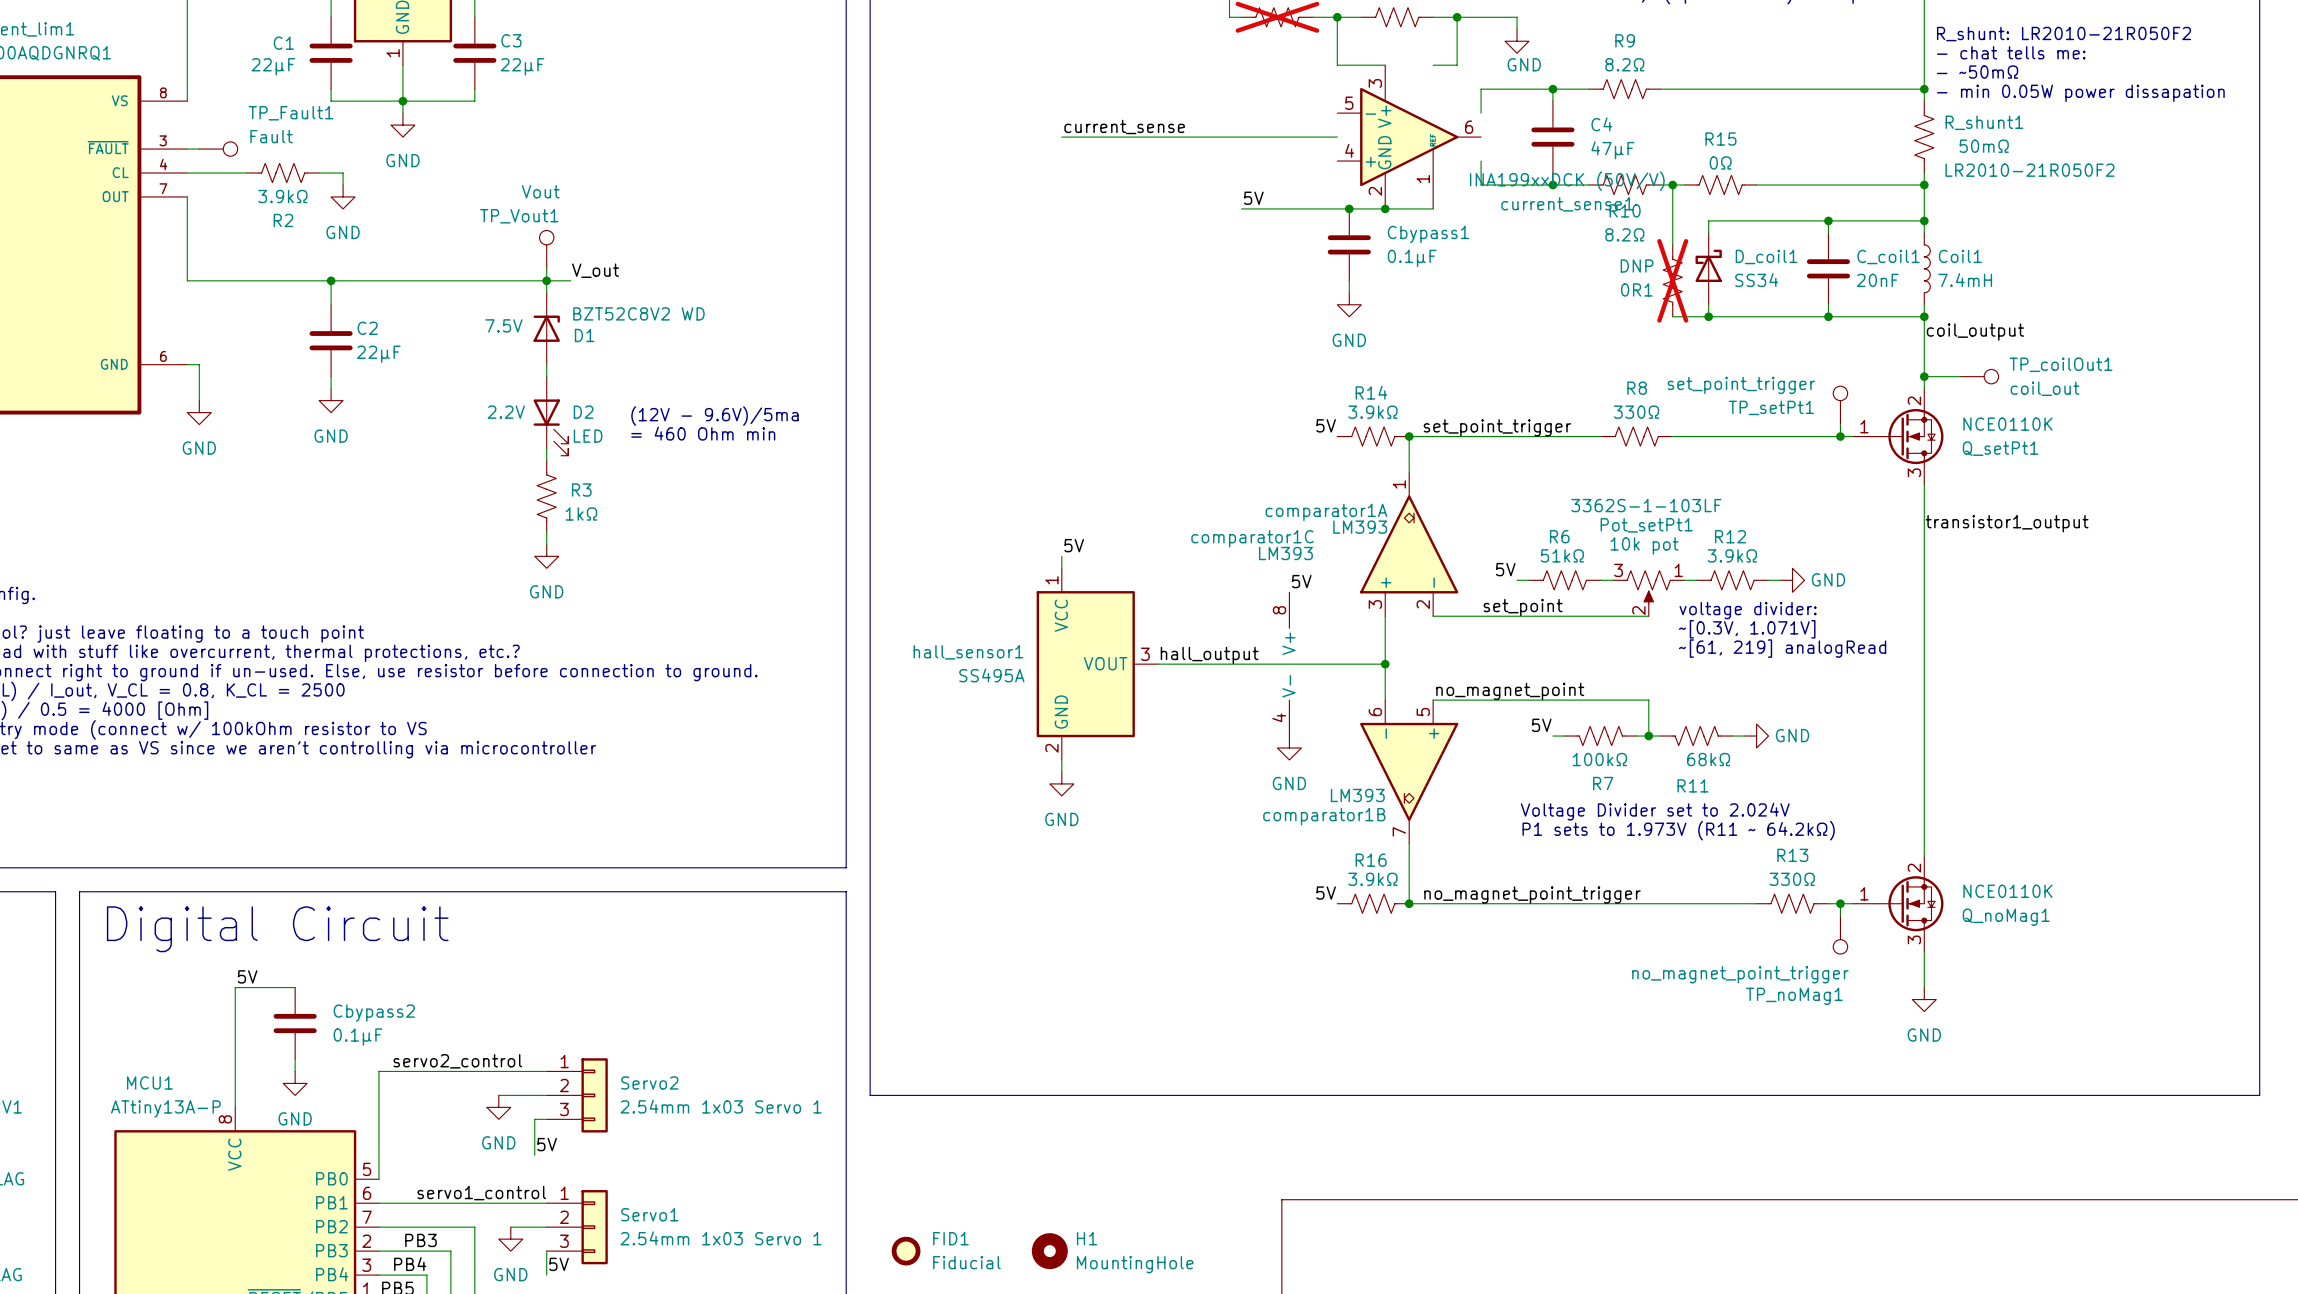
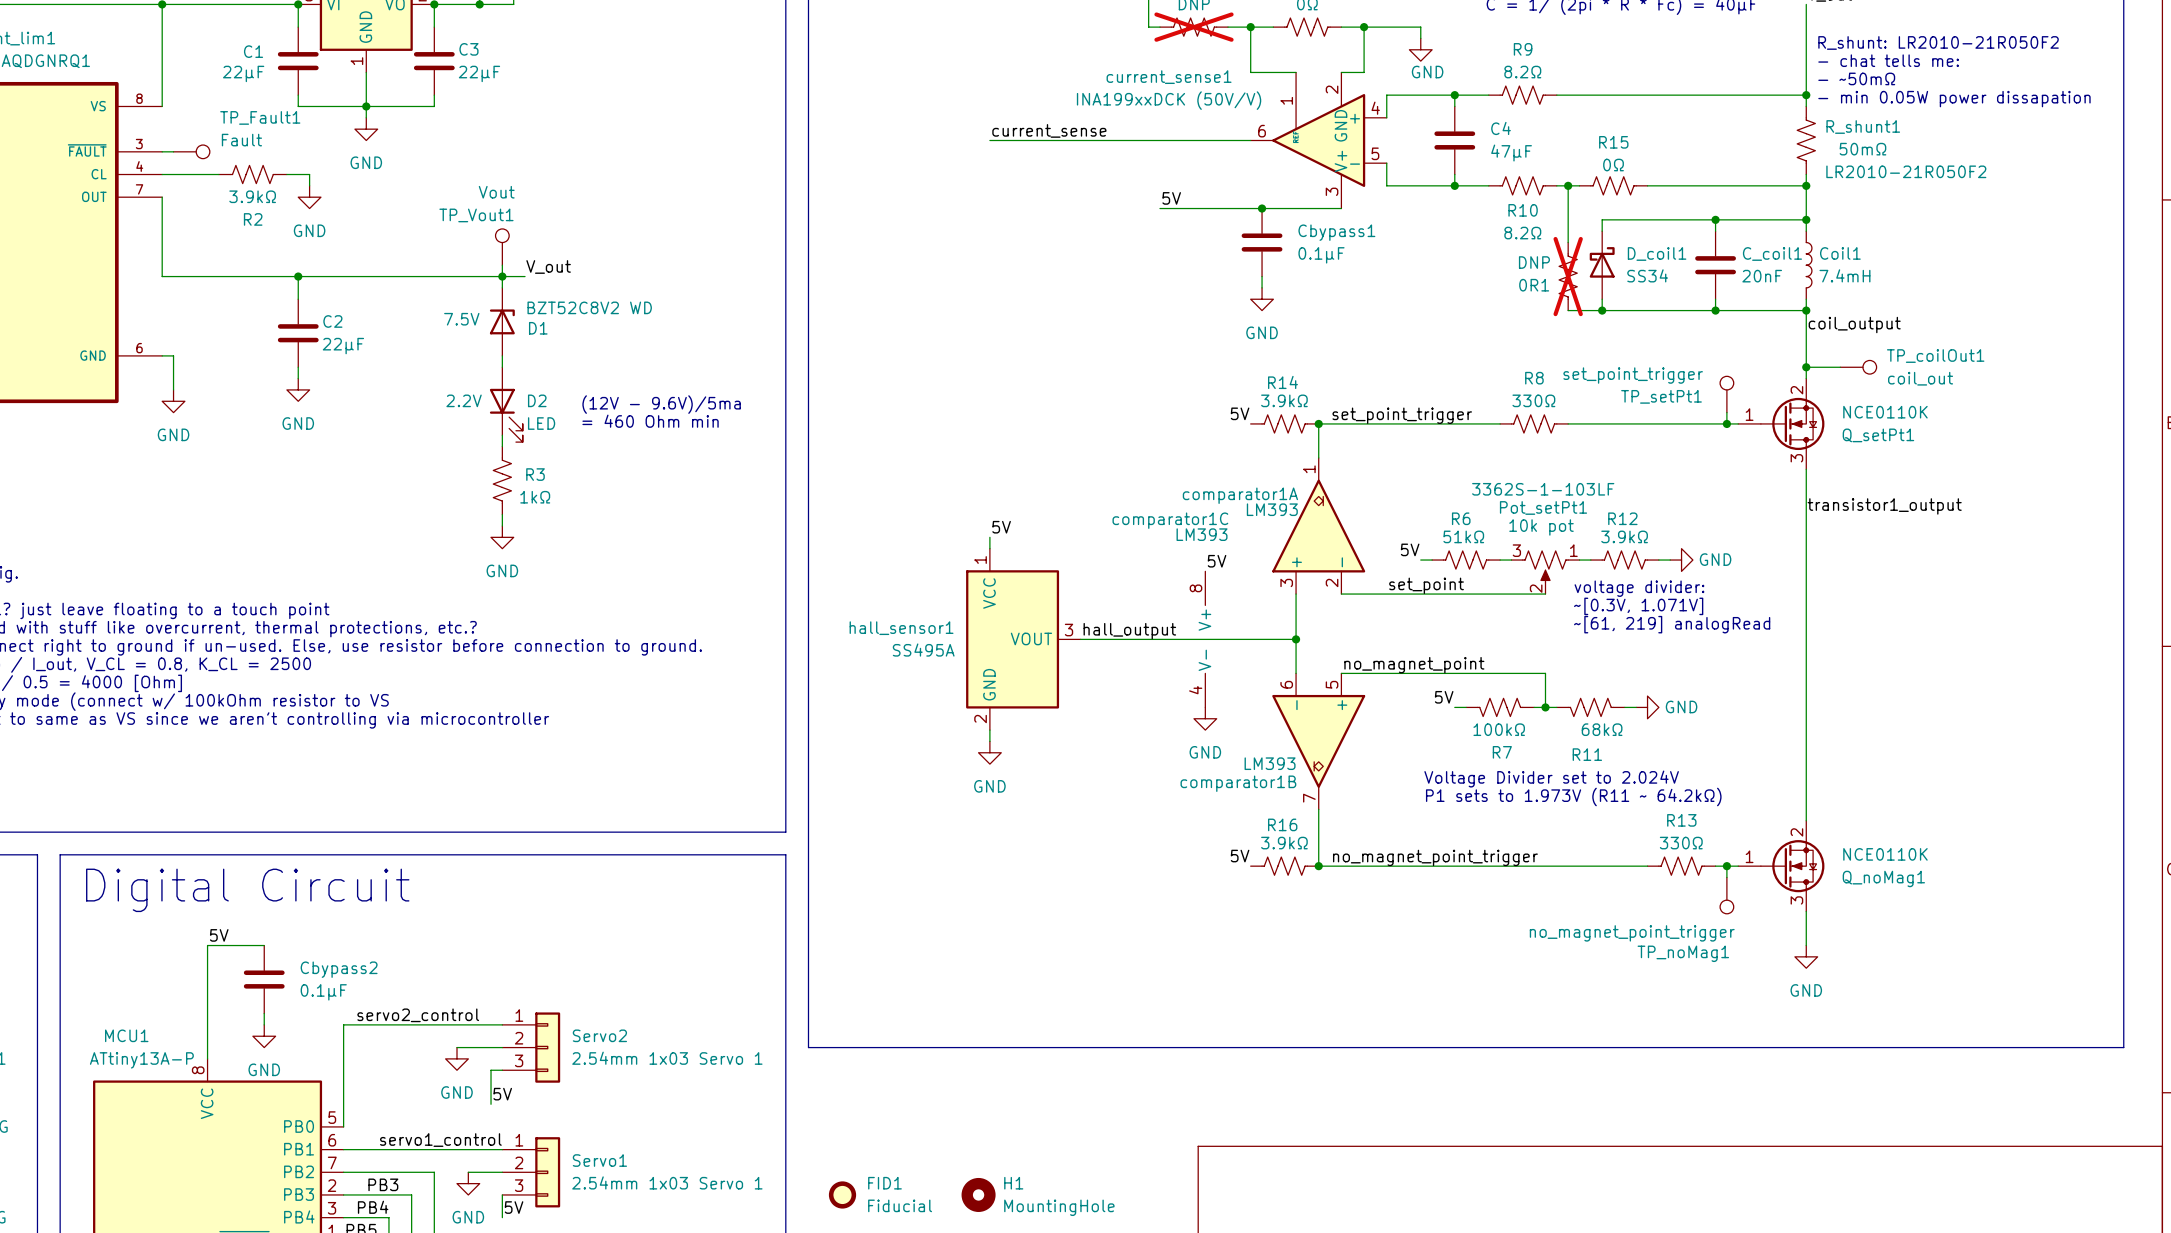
current_sense1 rotation: 0° (1409, 137) -> 180° (1318, 140)
junction: (1385, 208) -> none

